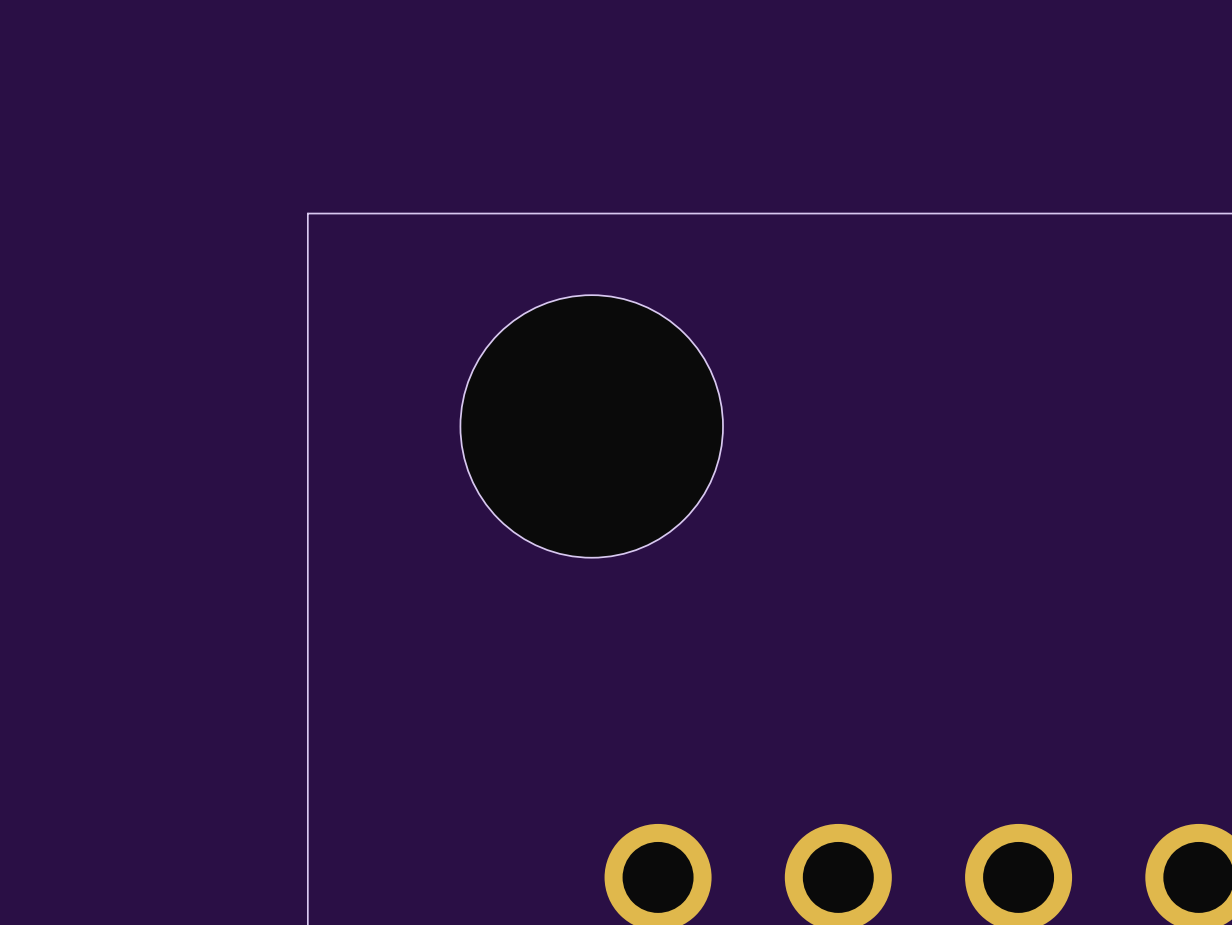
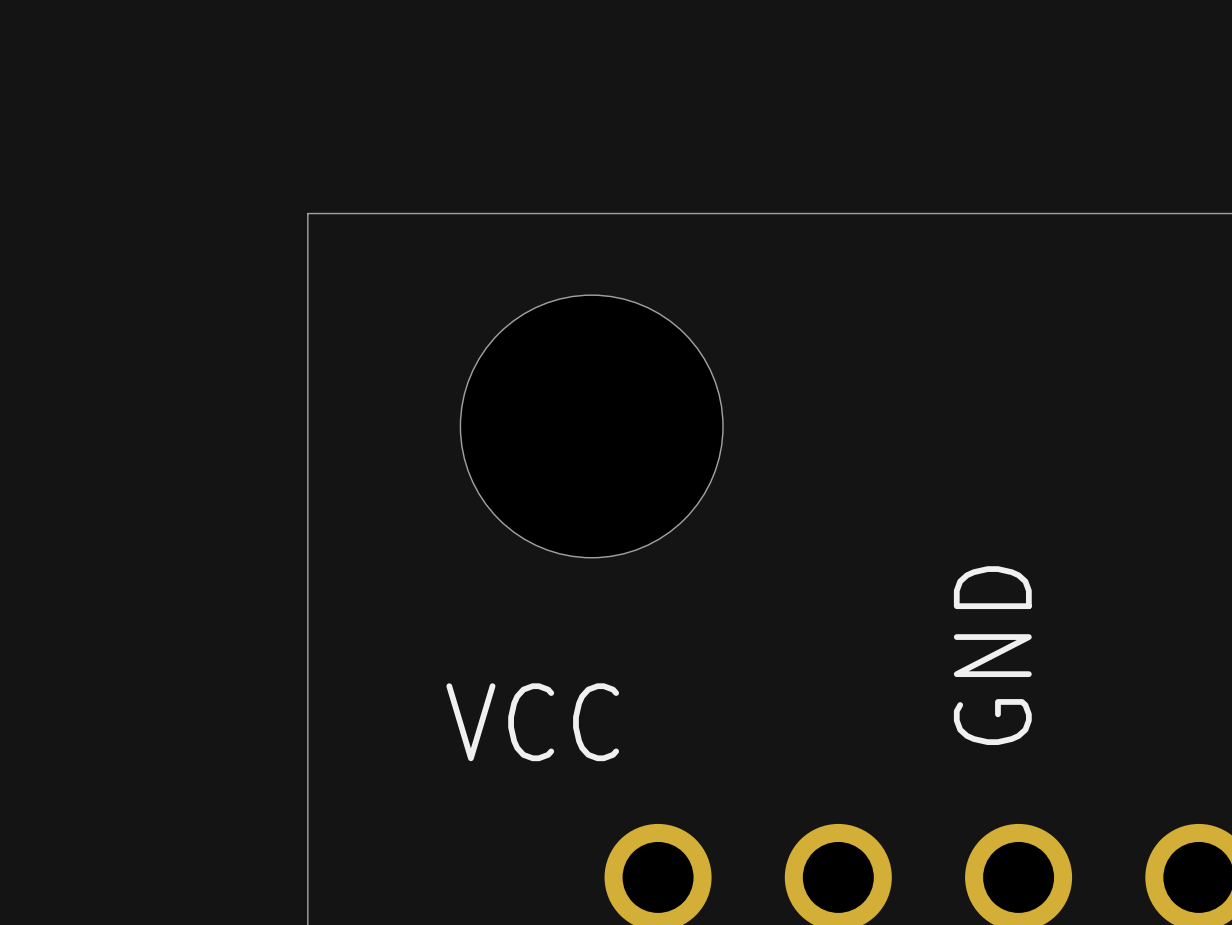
text: none -> GND (992, 655)
text: none -> VCC (532, 722)

